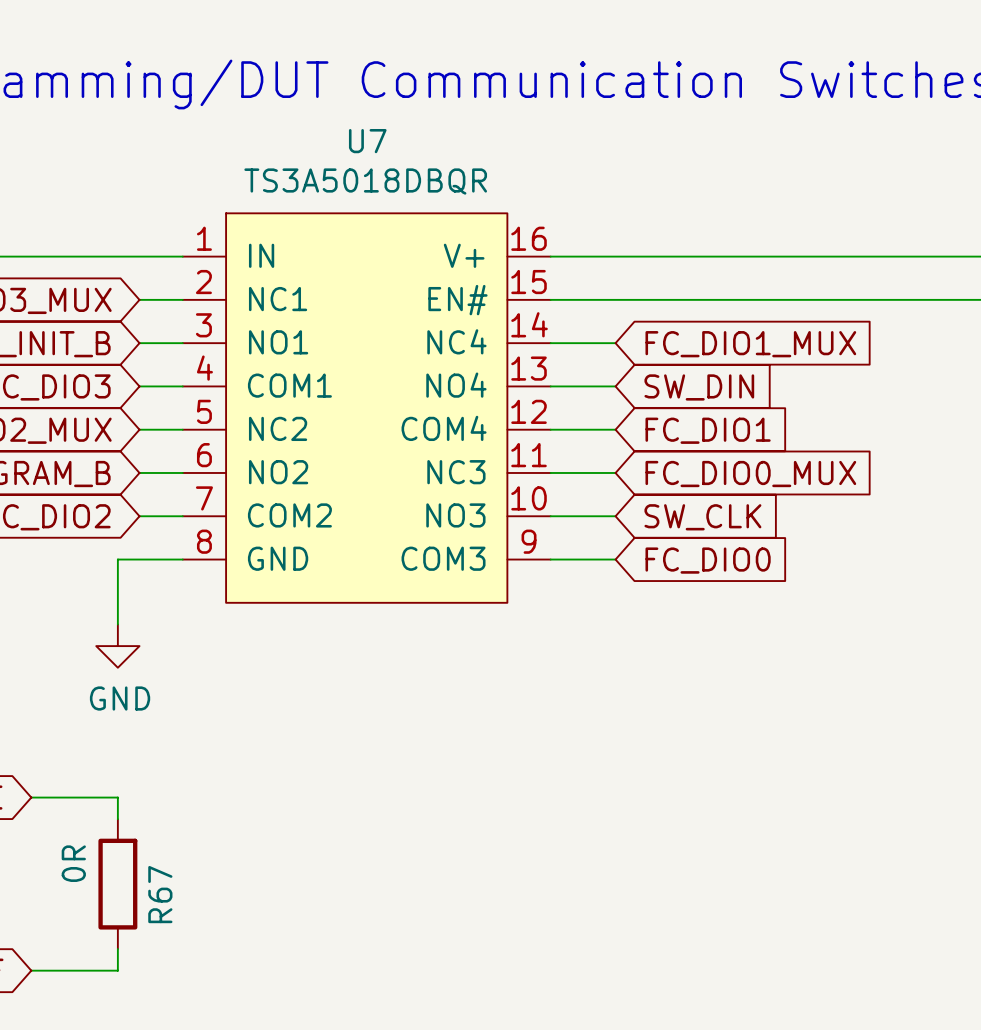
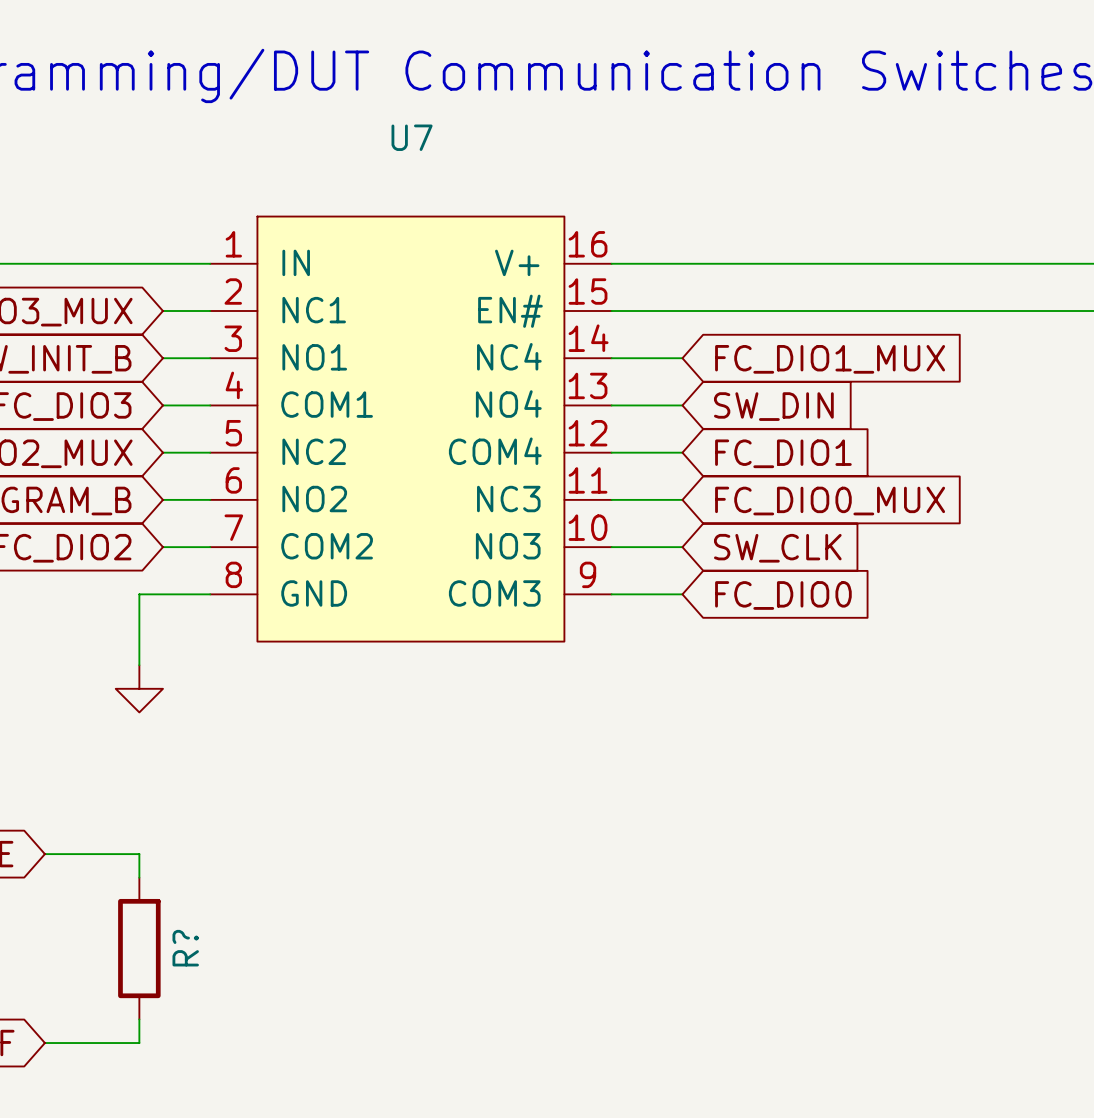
U7 value: TS3A5018DBQR (365, 181) -> none
power symbol text: GND (120, 698) -> none
R67 value: 0R (73, 863) -> none
R67 name: R67 (160, 894) -> R? (185, 948)

